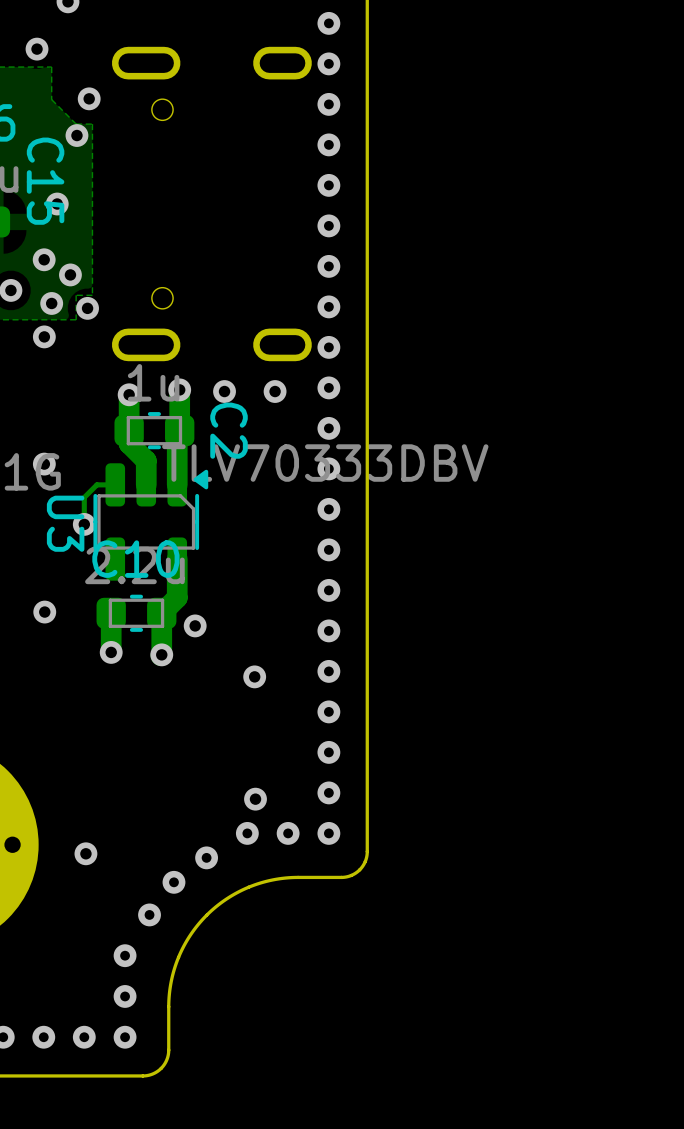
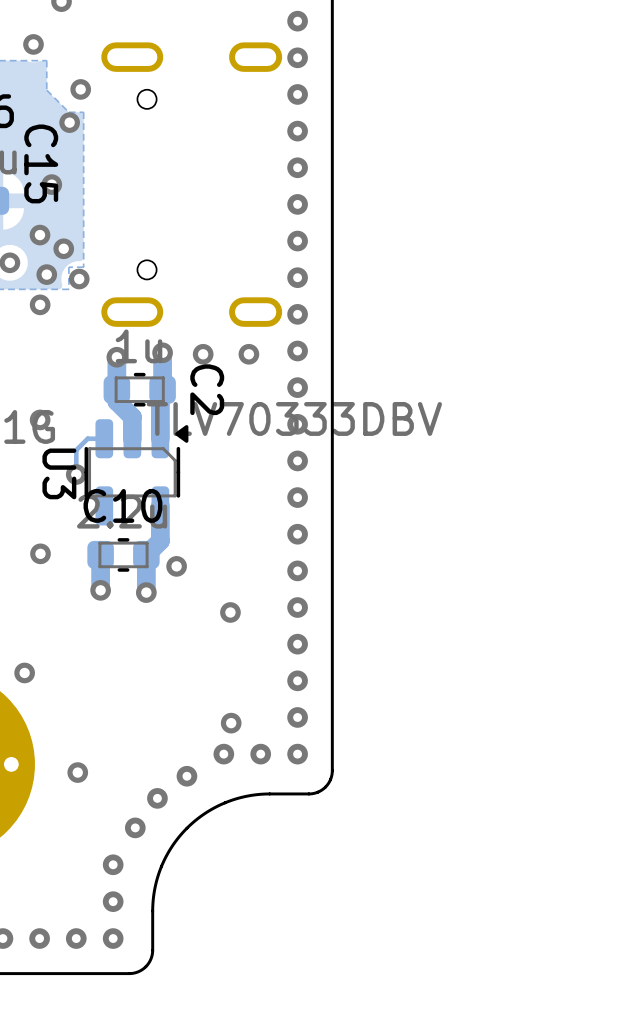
via: none -> (24, 672)

